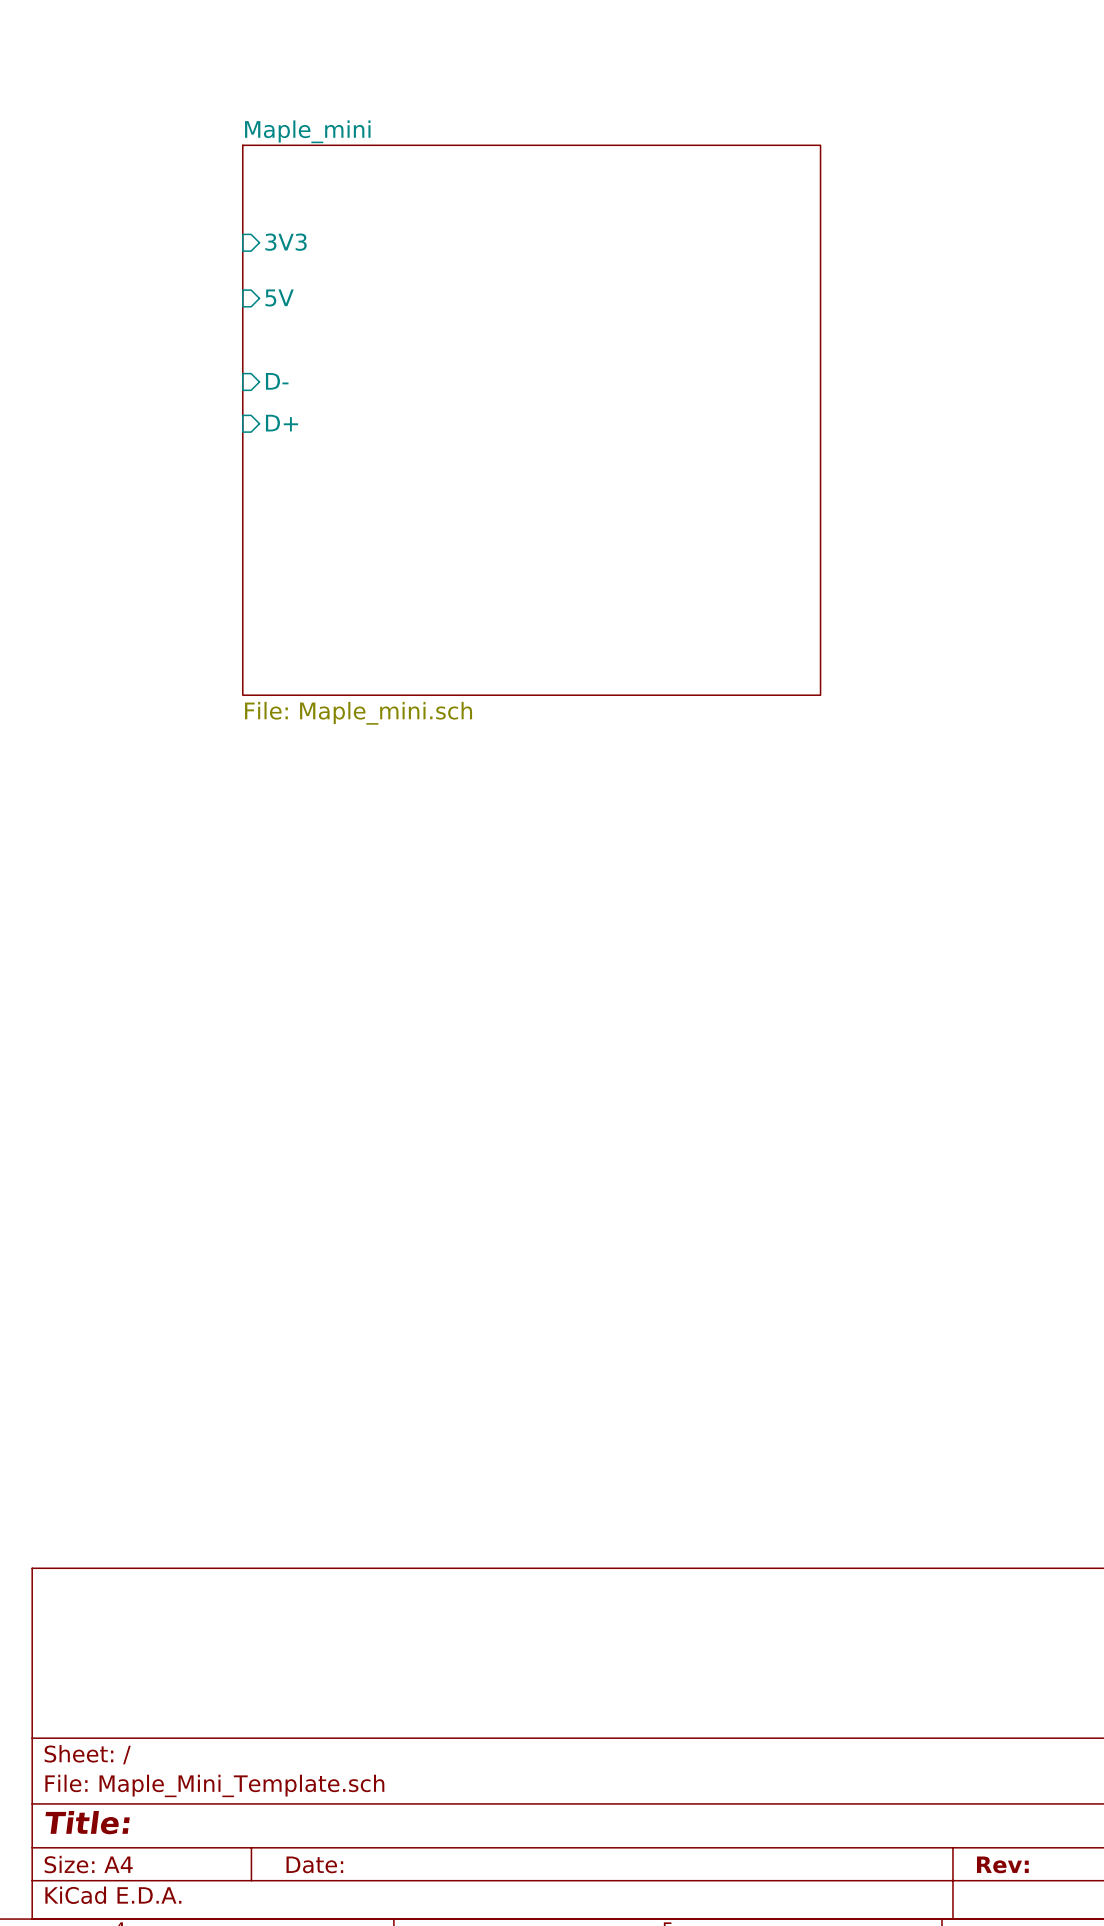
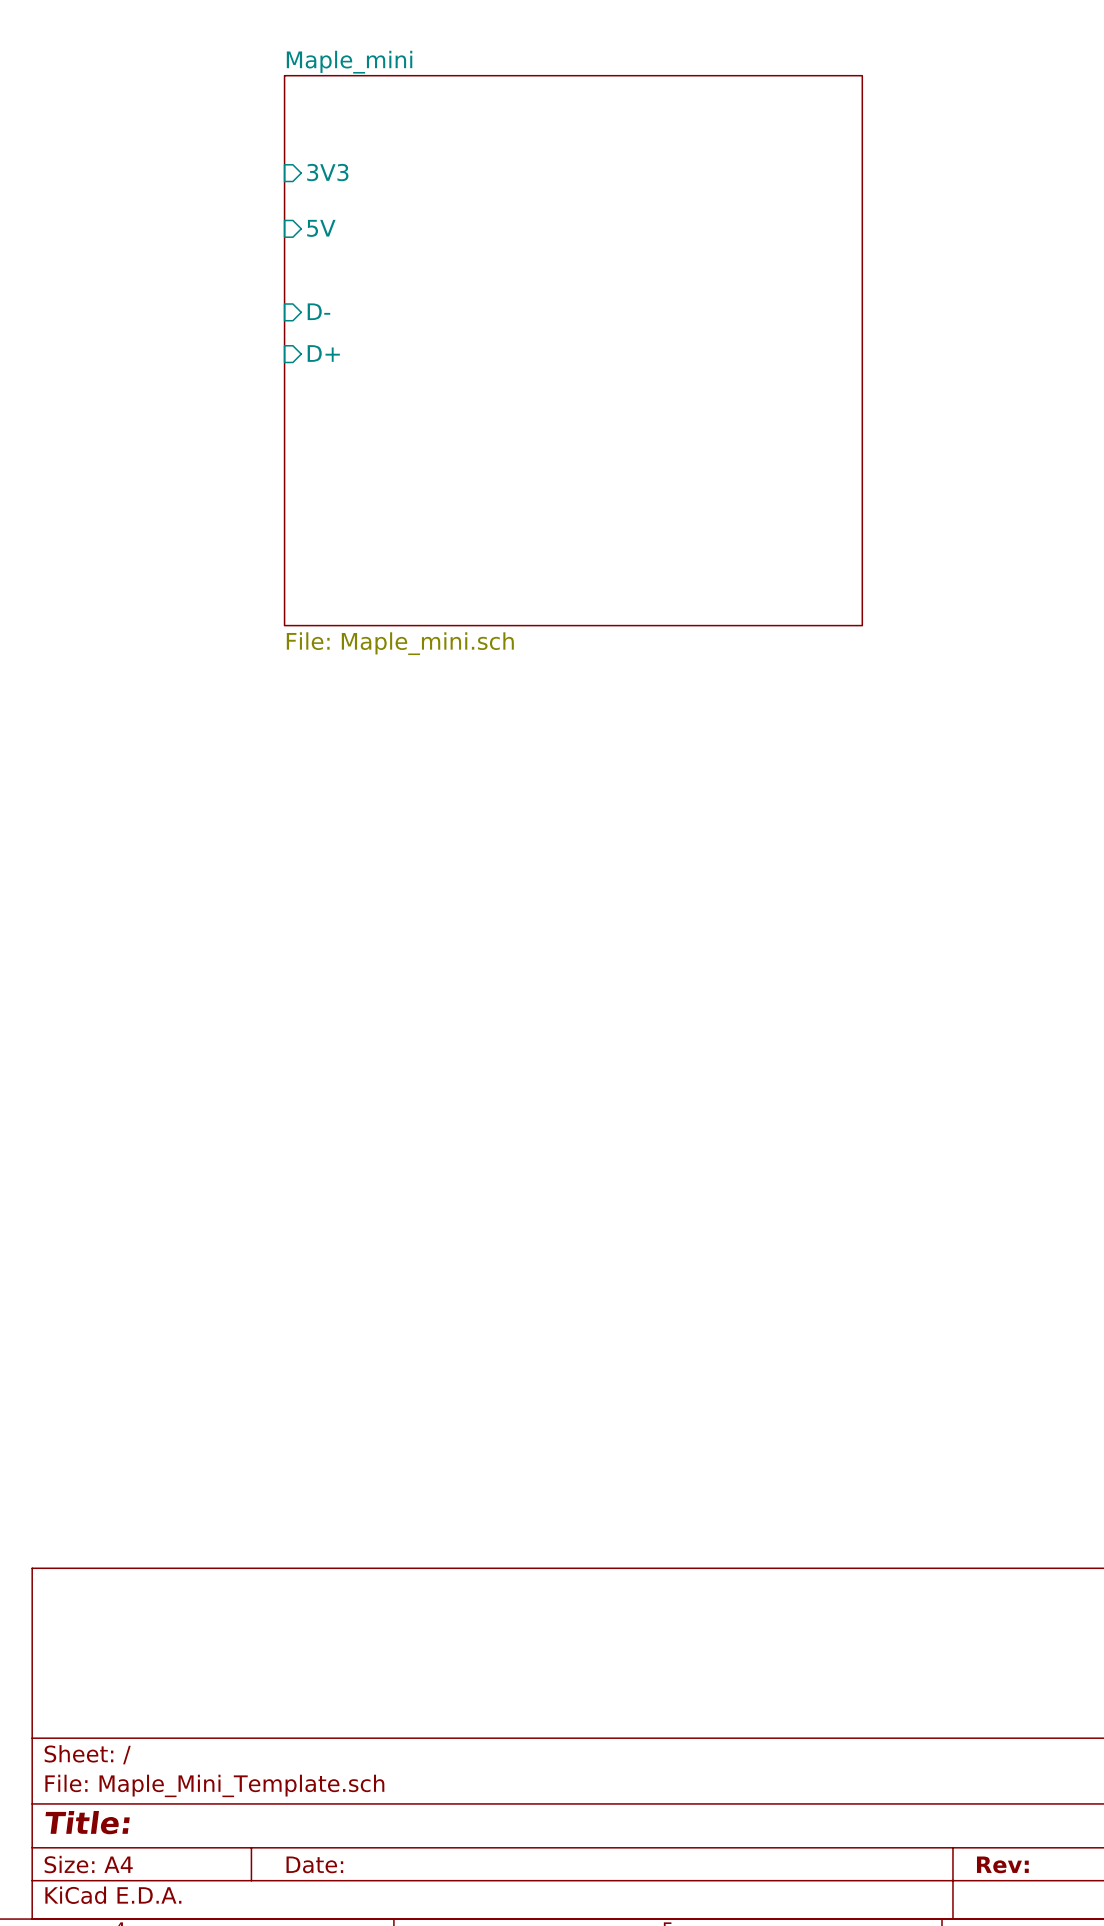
sheet pin position: 3V3 (286, 242) -> 3V3 (327, 172)
sheet pin position: 5V (279, 297) -> 5V (321, 228)
sheet pin position: D- (277, 381) -> D- (318, 311)
sheet Maple_mini position: (531, 420) -> (573, 350)
sheet pin position: D+ (282, 423) -> D+ (323, 353)

